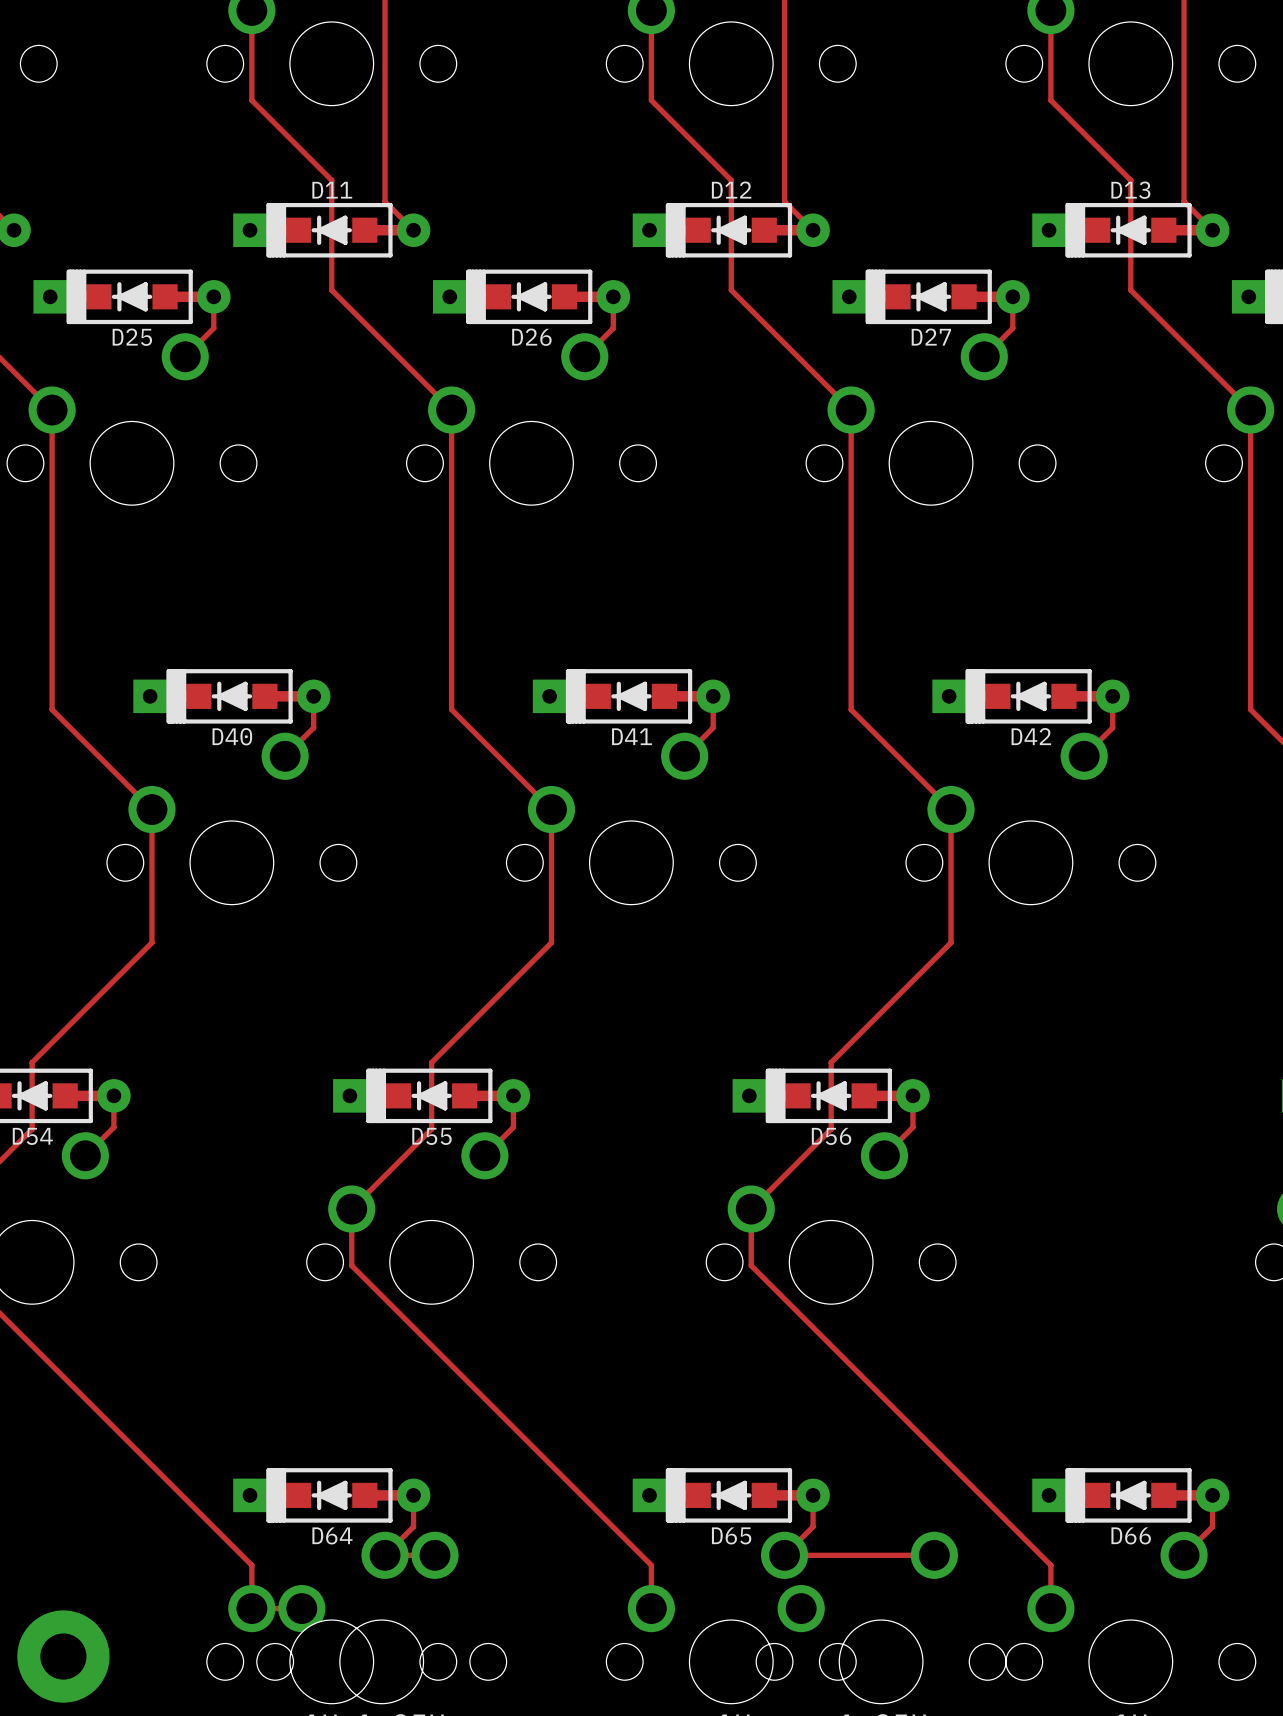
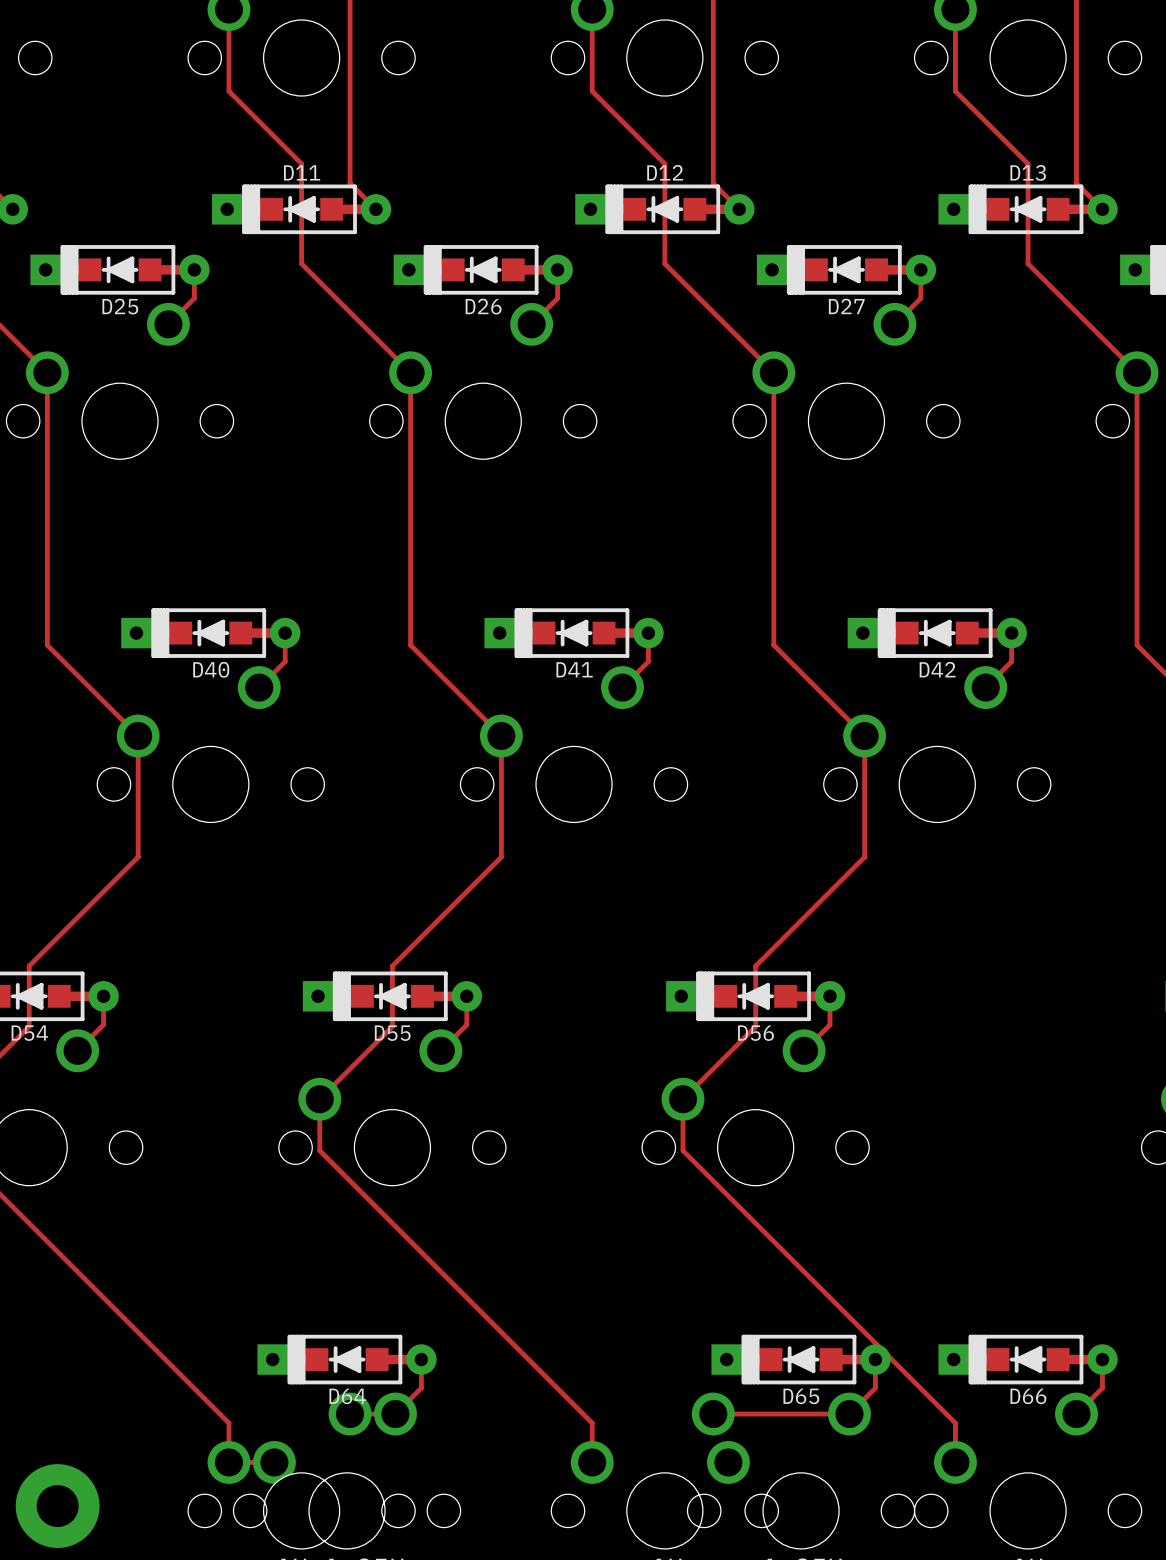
D64 position: (331, 1495) -> (347, 1359)
track: (413, 1495) (413, 1526) (385, 1555) -> (421, 1359) (421, 1388) (395, 1414)
D65 position: (731, 1495) -> (801, 1359)
track: (813, 1495) (813, 1526) (784, 1555) -> (875, 1359) (875, 1388) (849, 1414)

